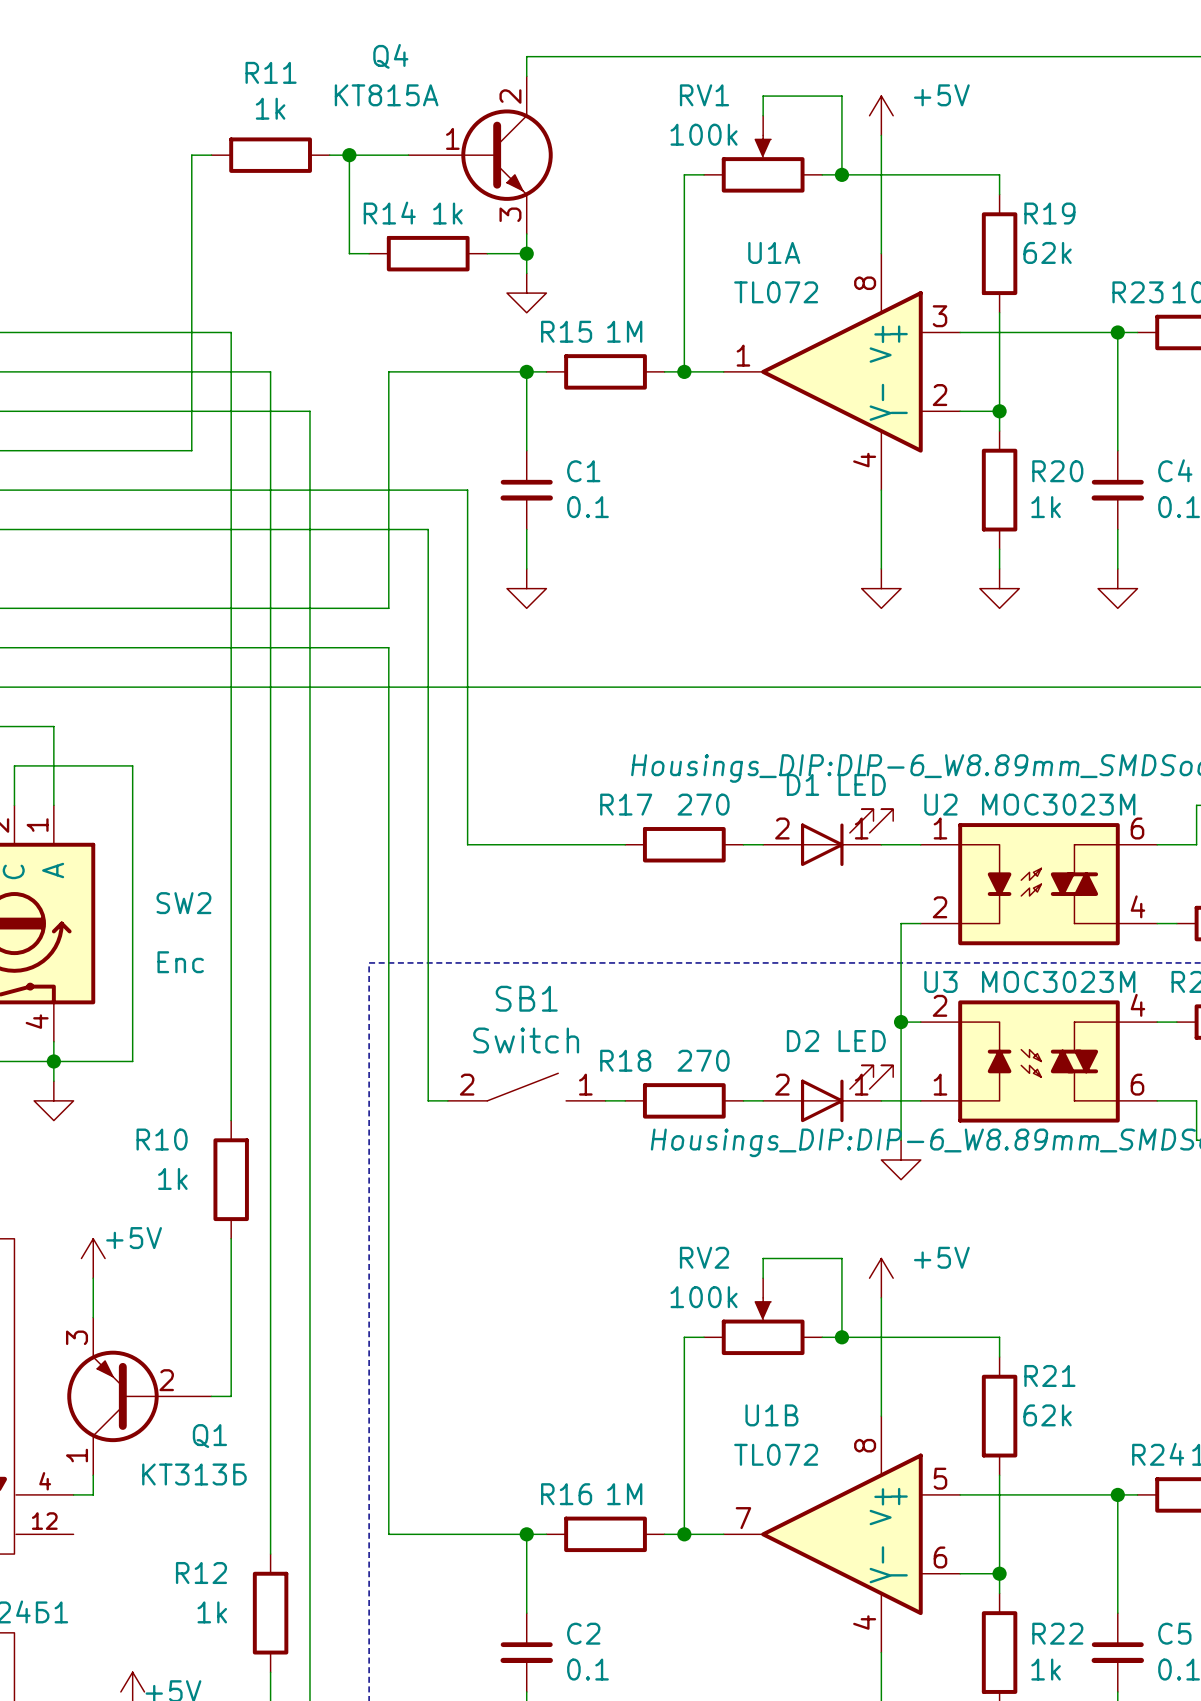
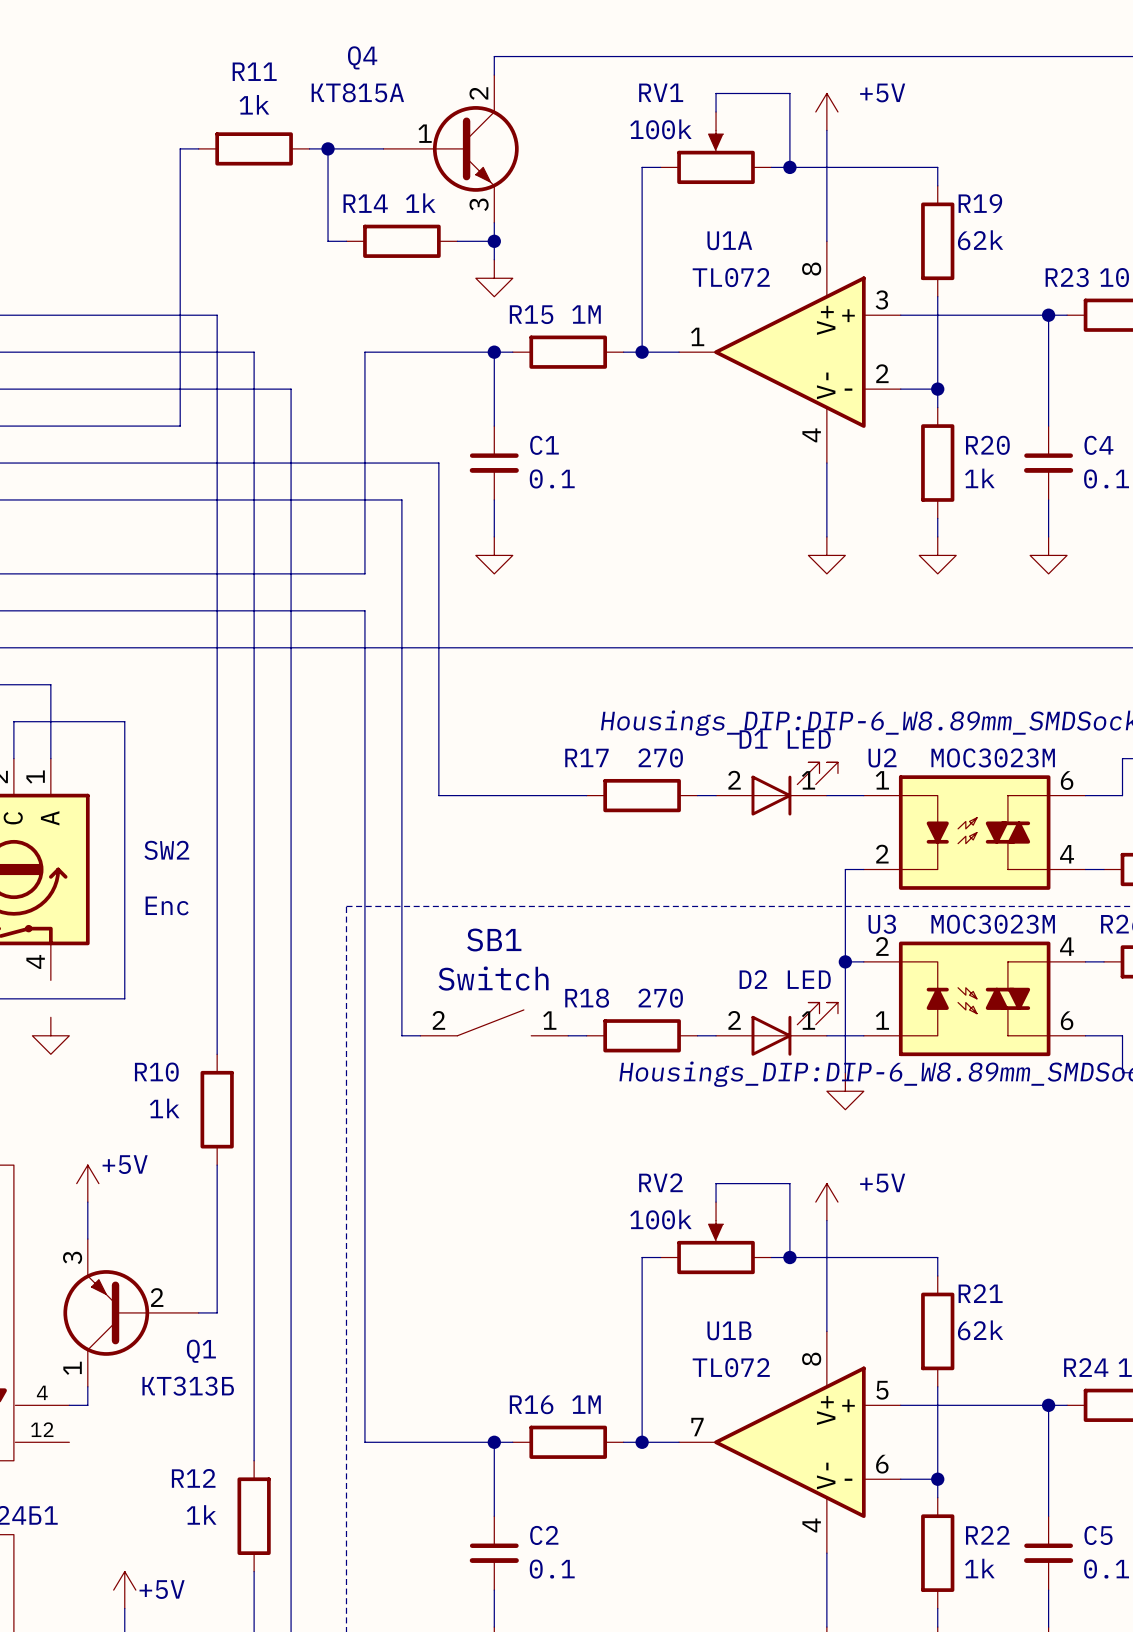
wire: (53, 1041) (53, 1081) -> none
junction: (53, 1061) -> none

